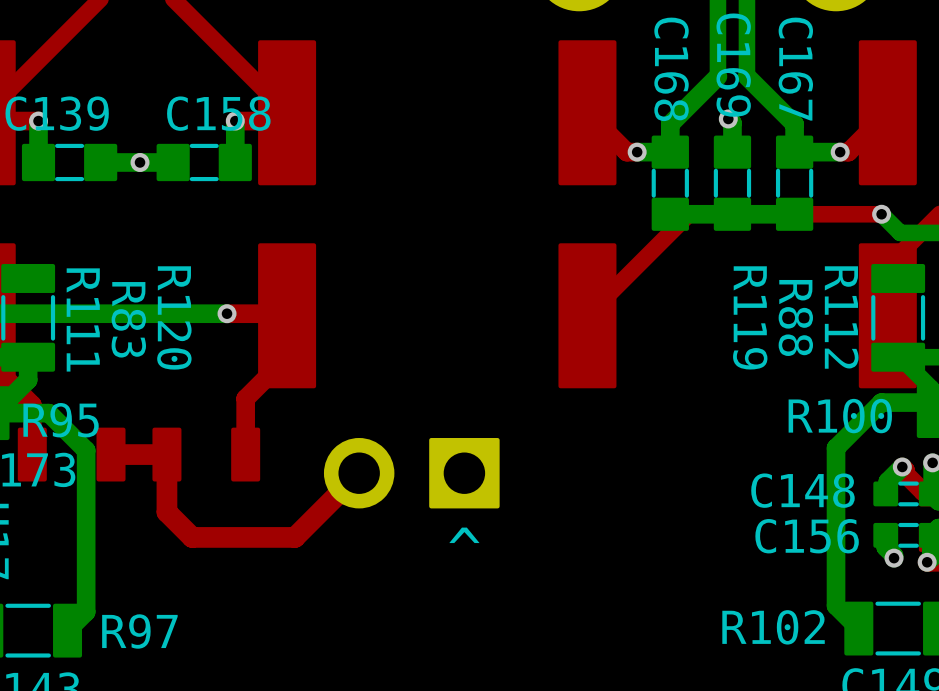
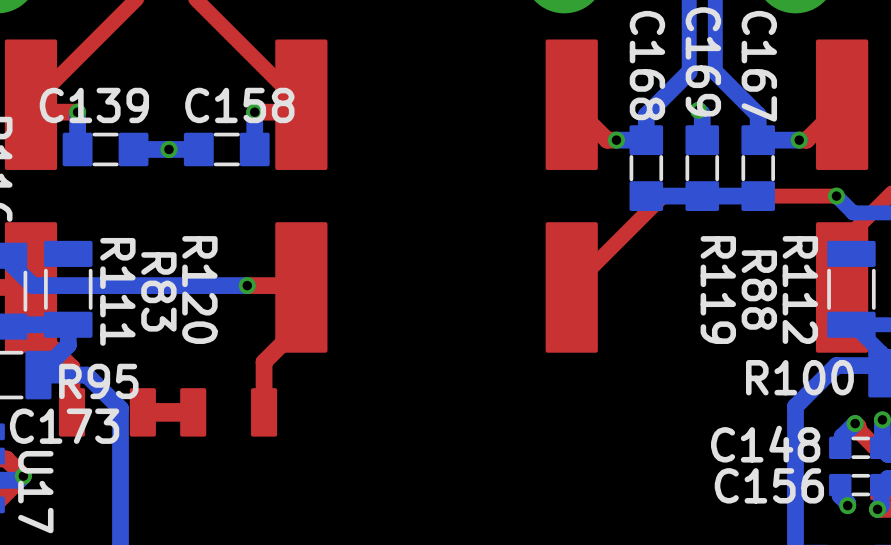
top track: (166, 454) (166, 512) (192, 537) (294, 537) (359, 473) -> none
part: (411, 473) -> none

